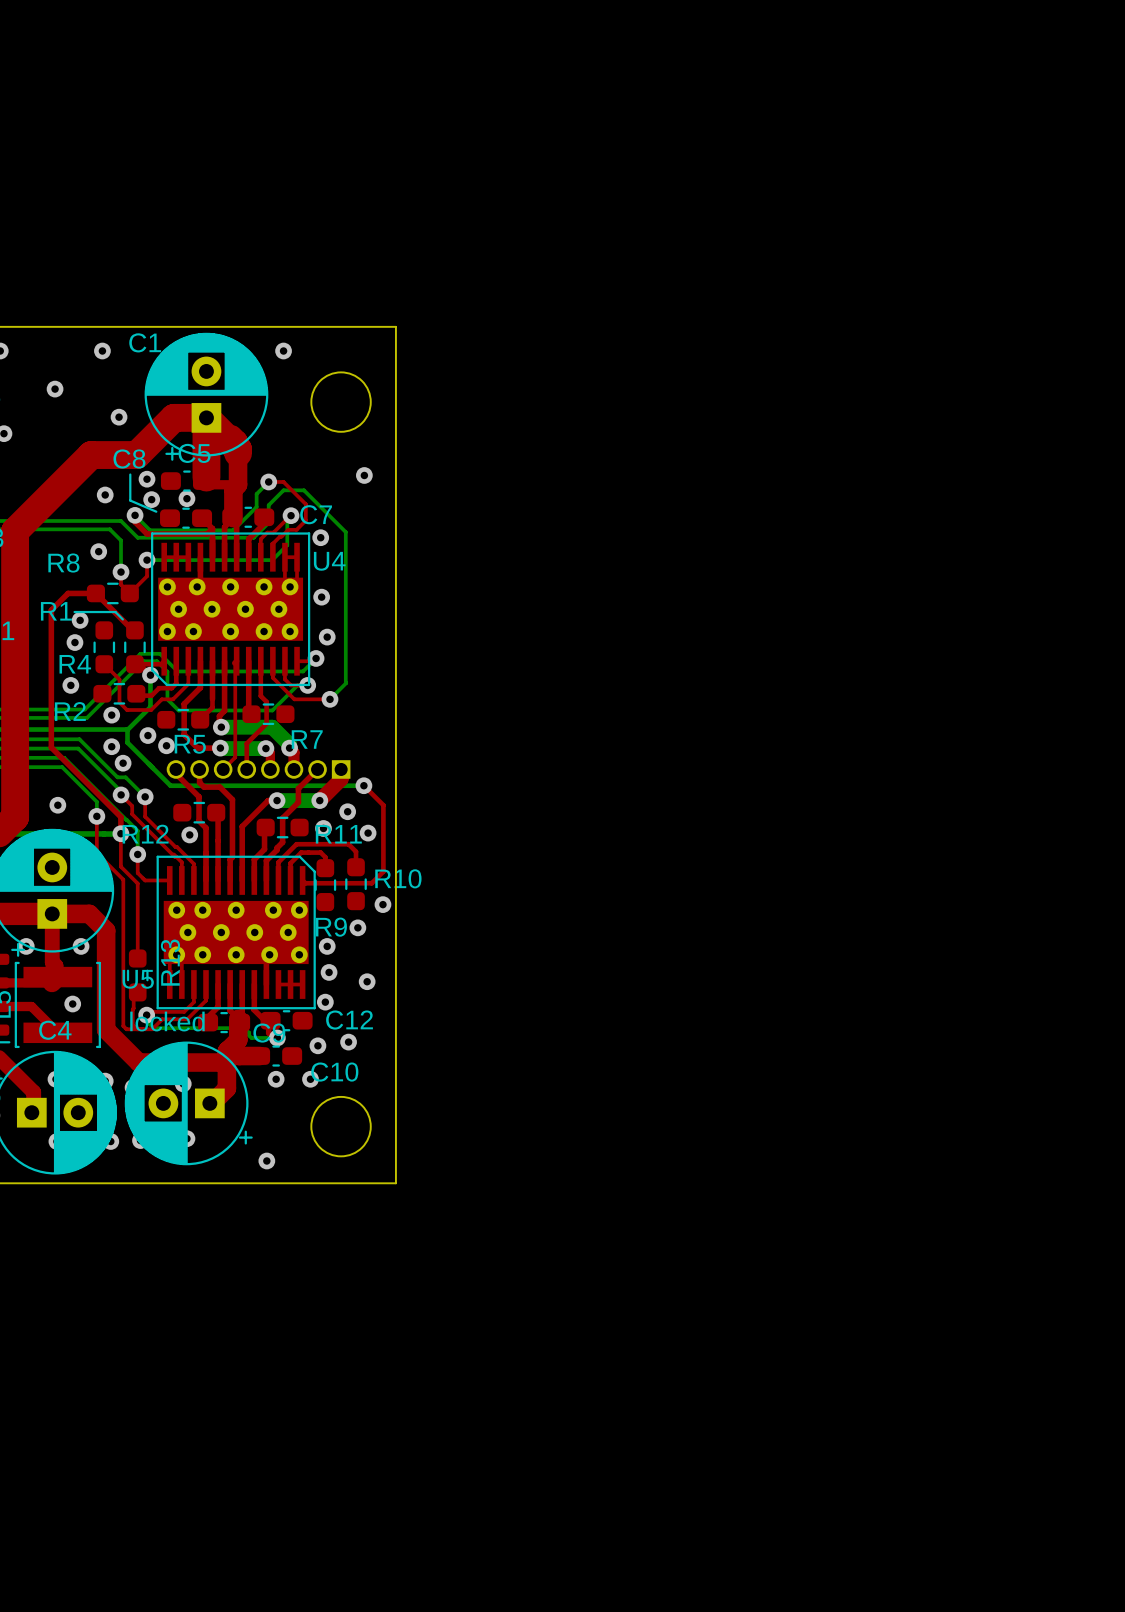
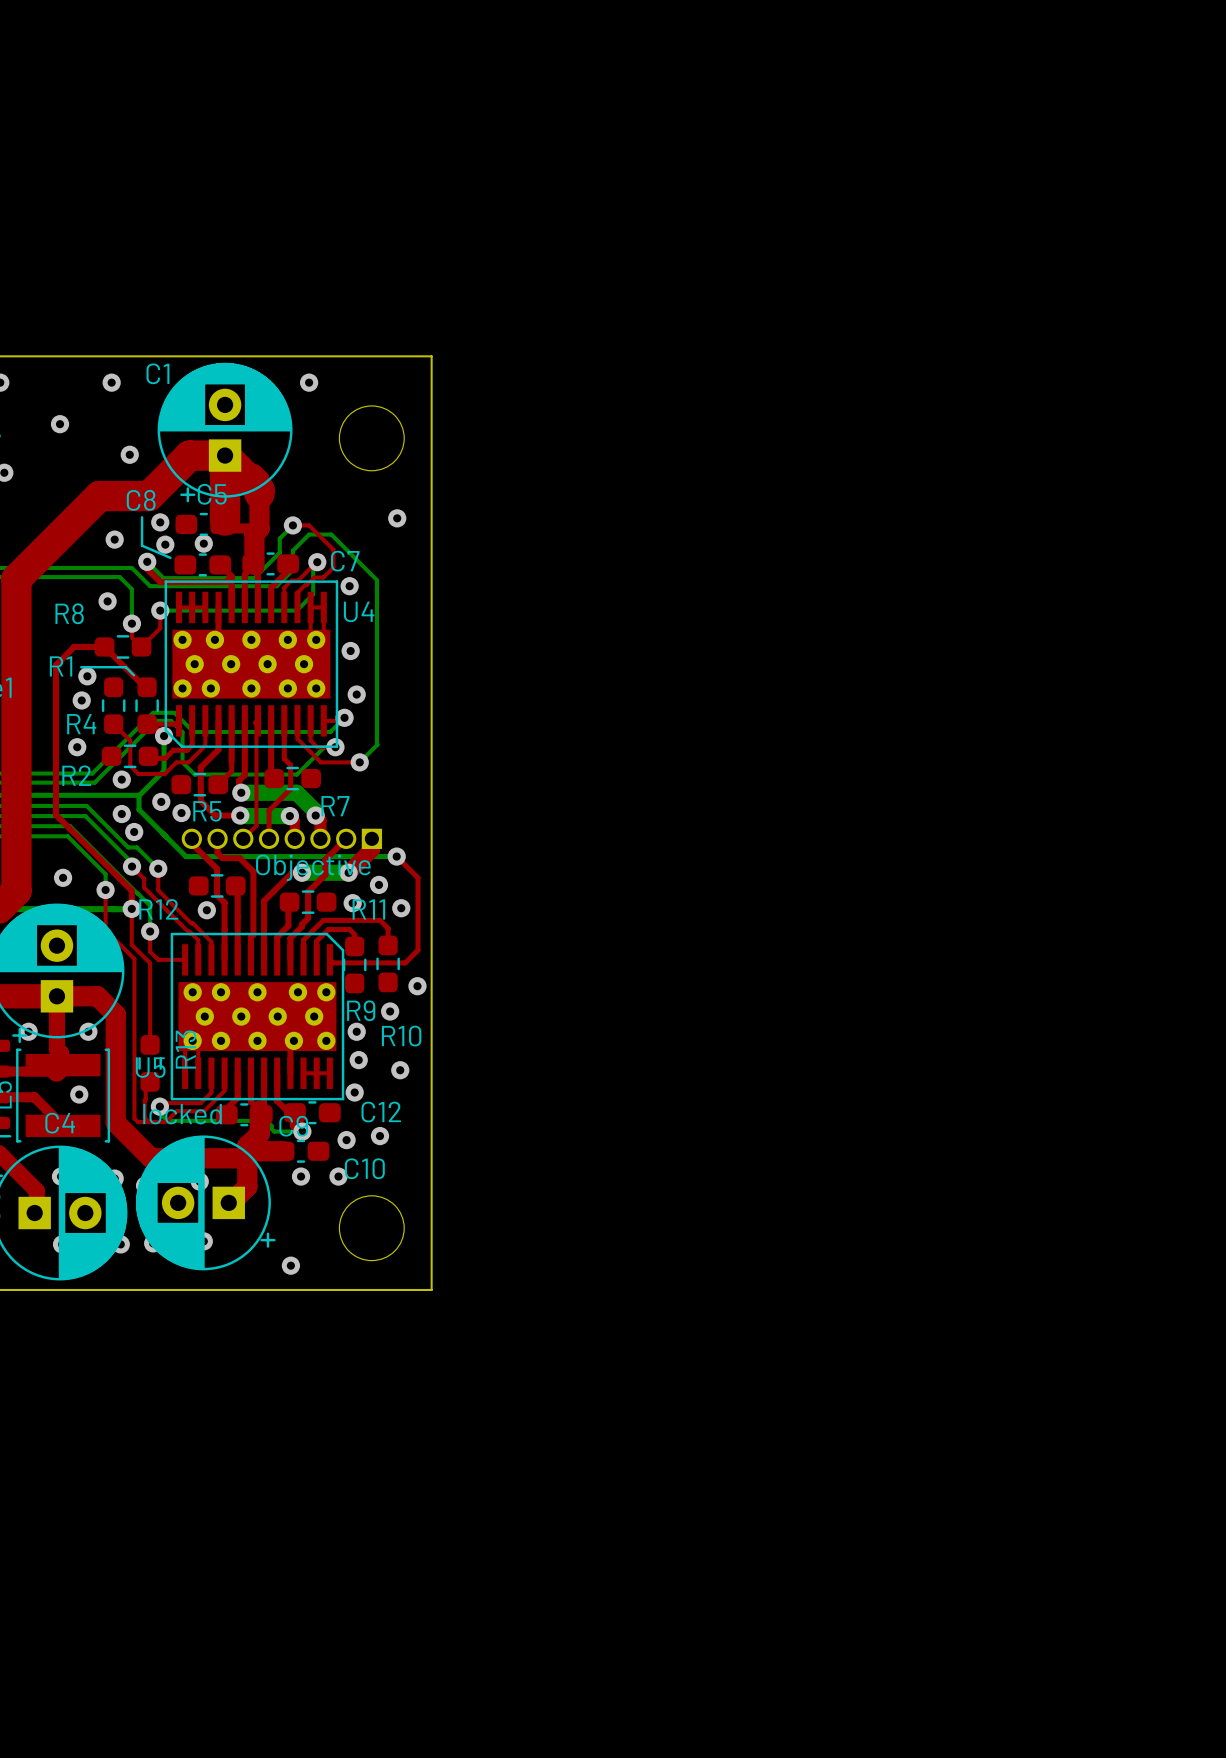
part value: none -> Objective (313, 867)
R10 name position: R10 (398, 878) -> R10 (401, 1036)

